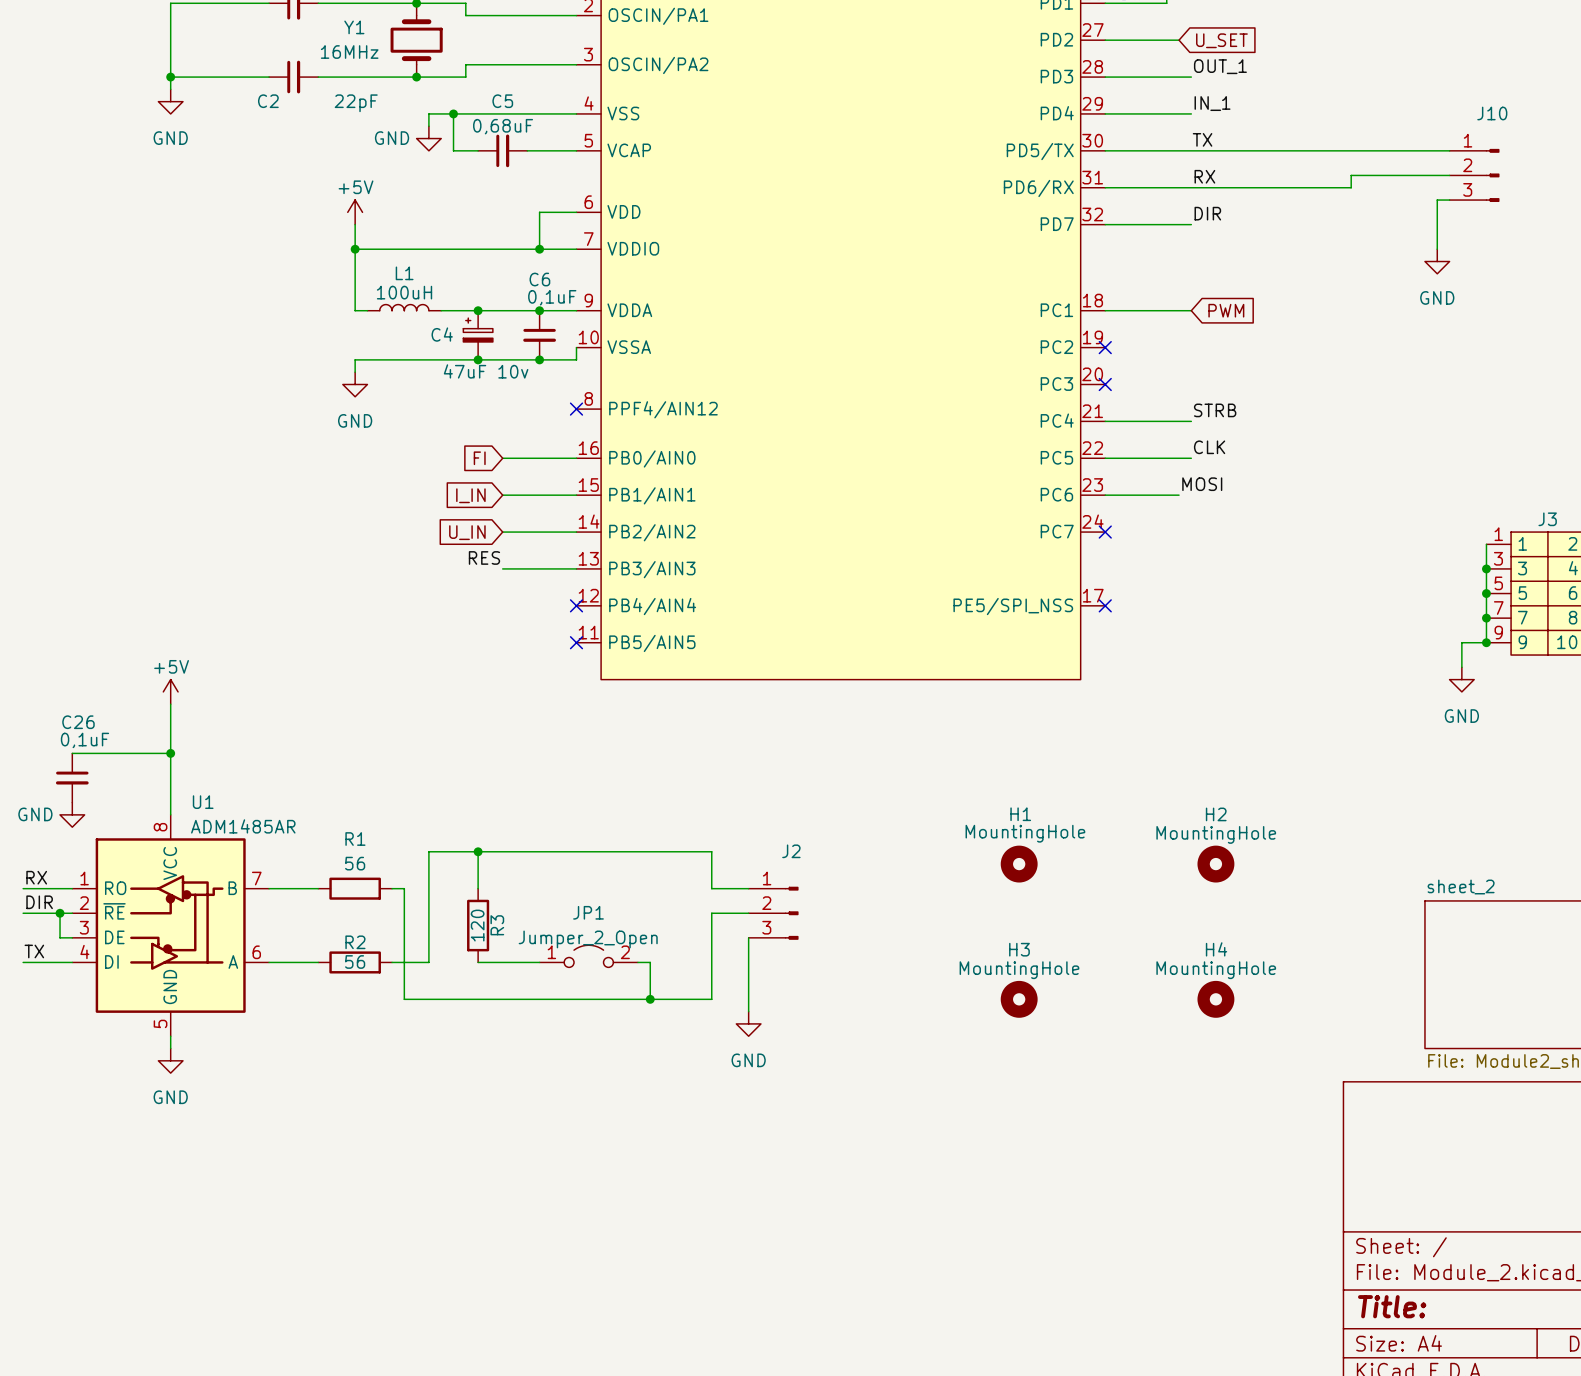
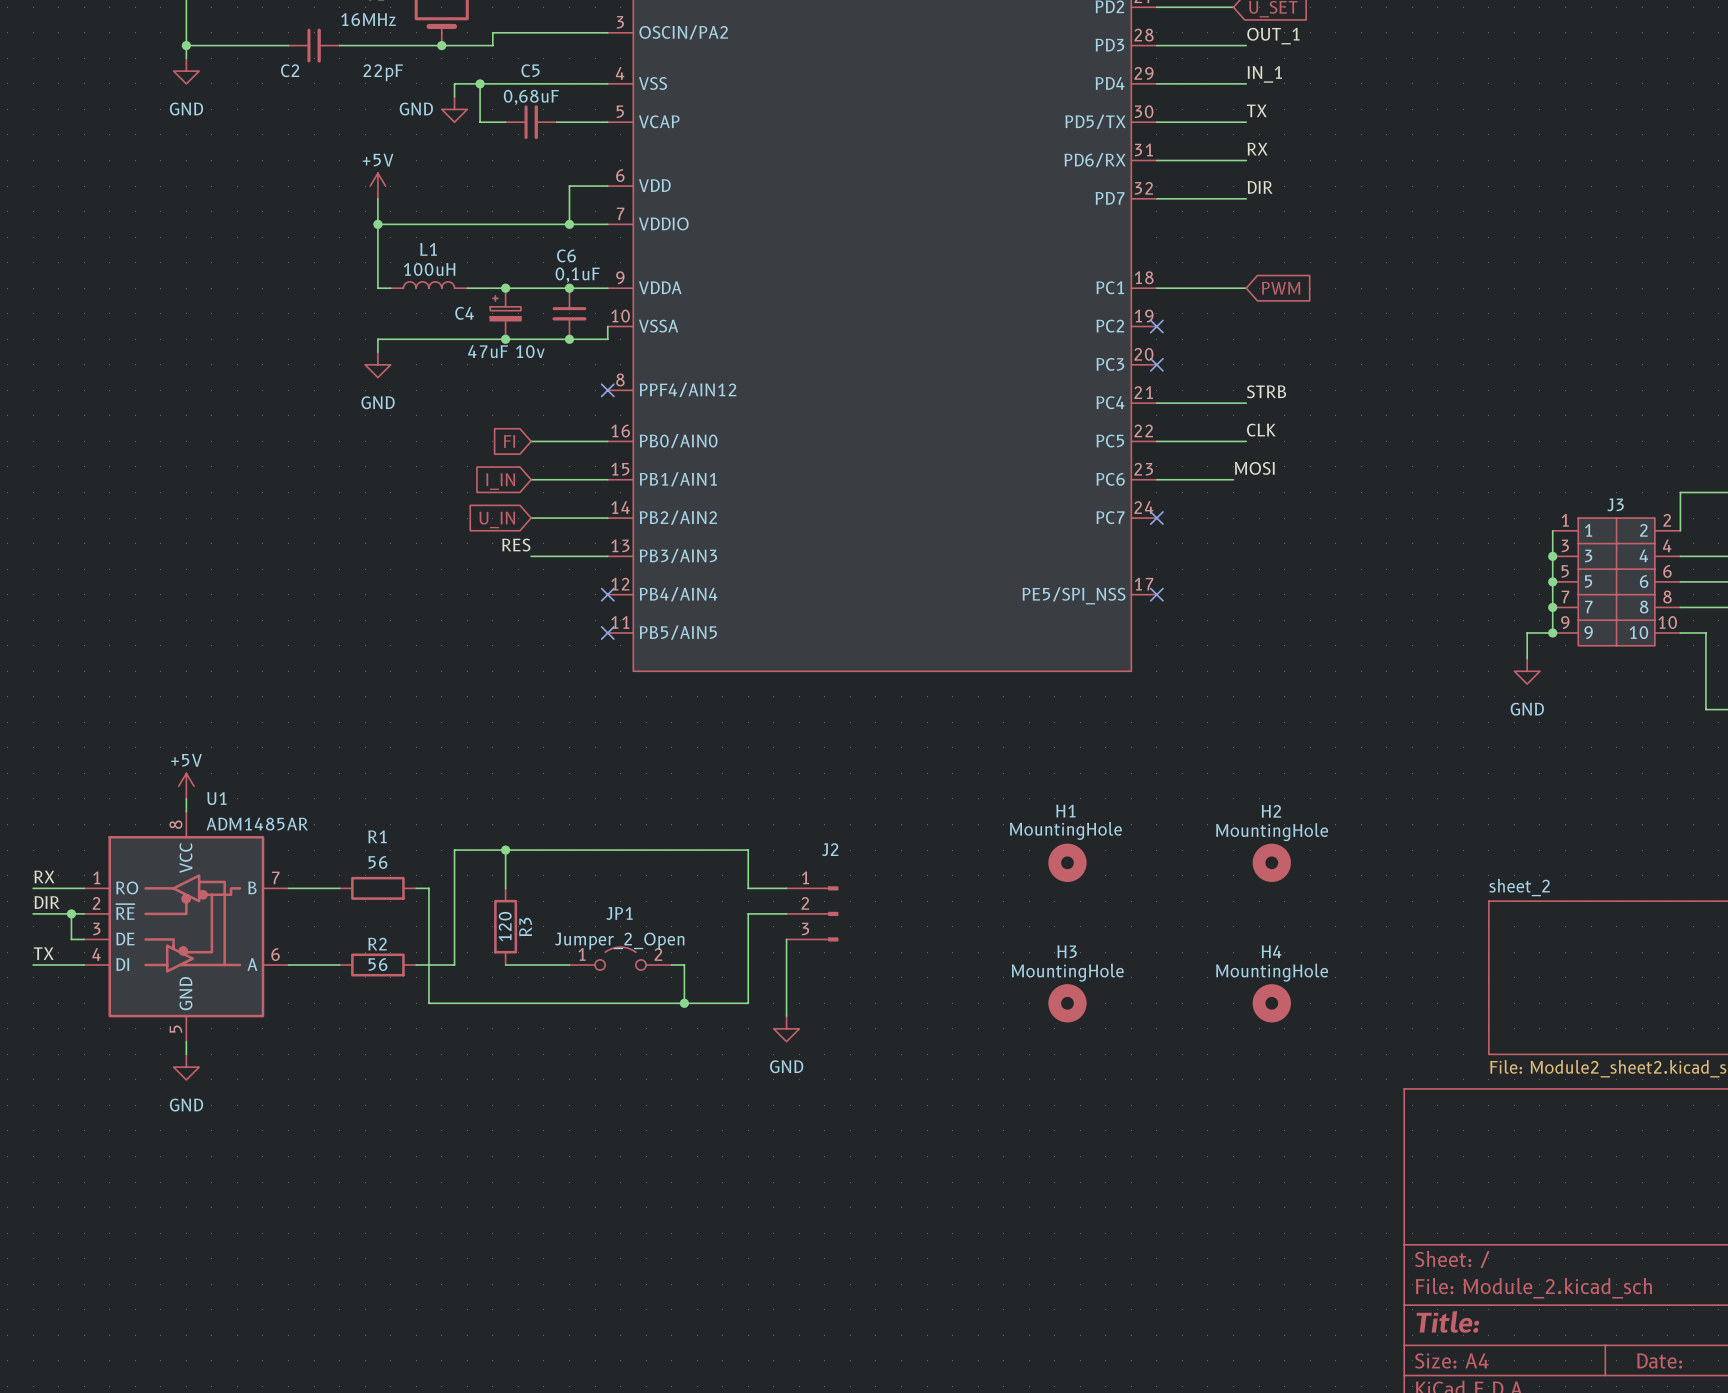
wire: (1191, 150) (1449, 150) -> none
wire: (1449, 175) (1351, 175) (1351, 187) (1191, 187) -> none
J10: (1474, 175) -> none
wire: (1449, 200) (1437, 200) (1437, 249) -> none
power symbol: GND (1437, 261) -> none
power symbol position: +5V (170, 691) -> +5V (186, 786)
wire: (170, 704) (170, 802) -> none
wire: (72, 753) (170, 753) -> none
junction: (170, 753) -> none
C26: 0,1uF (72, 777) -> none
power symbol: GND (72, 814) -> none

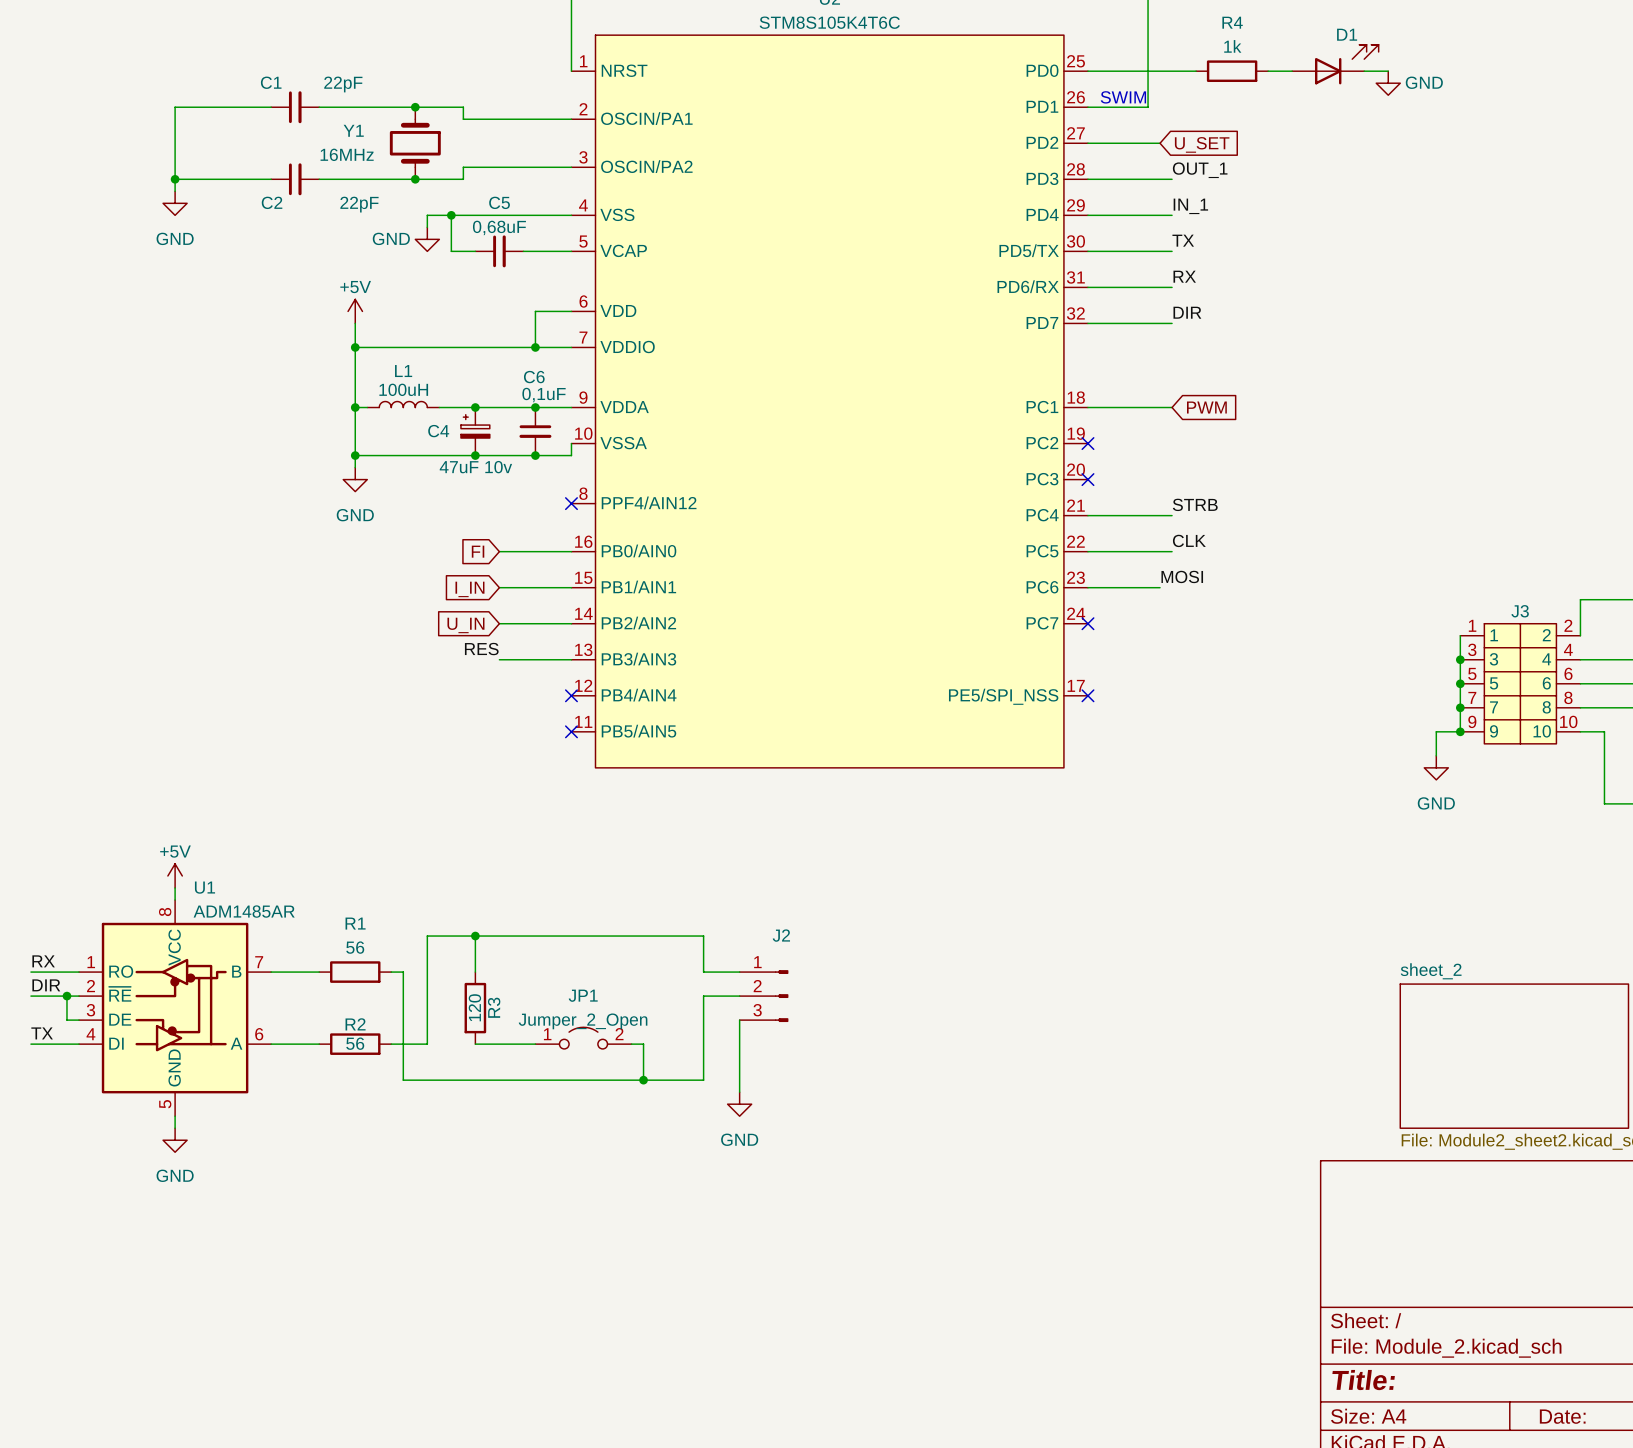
wire: none -> (355, 407) (355, 455)
junction: none -> (355, 407)
junction: none -> (355, 455)
H1: MountingHole (1067, 862) -> none
H2: MountingHole (1271, 862) -> none
H3: MountingHole (1067, 1003) -> none
H4: MountingHole (1271, 1003) -> none

